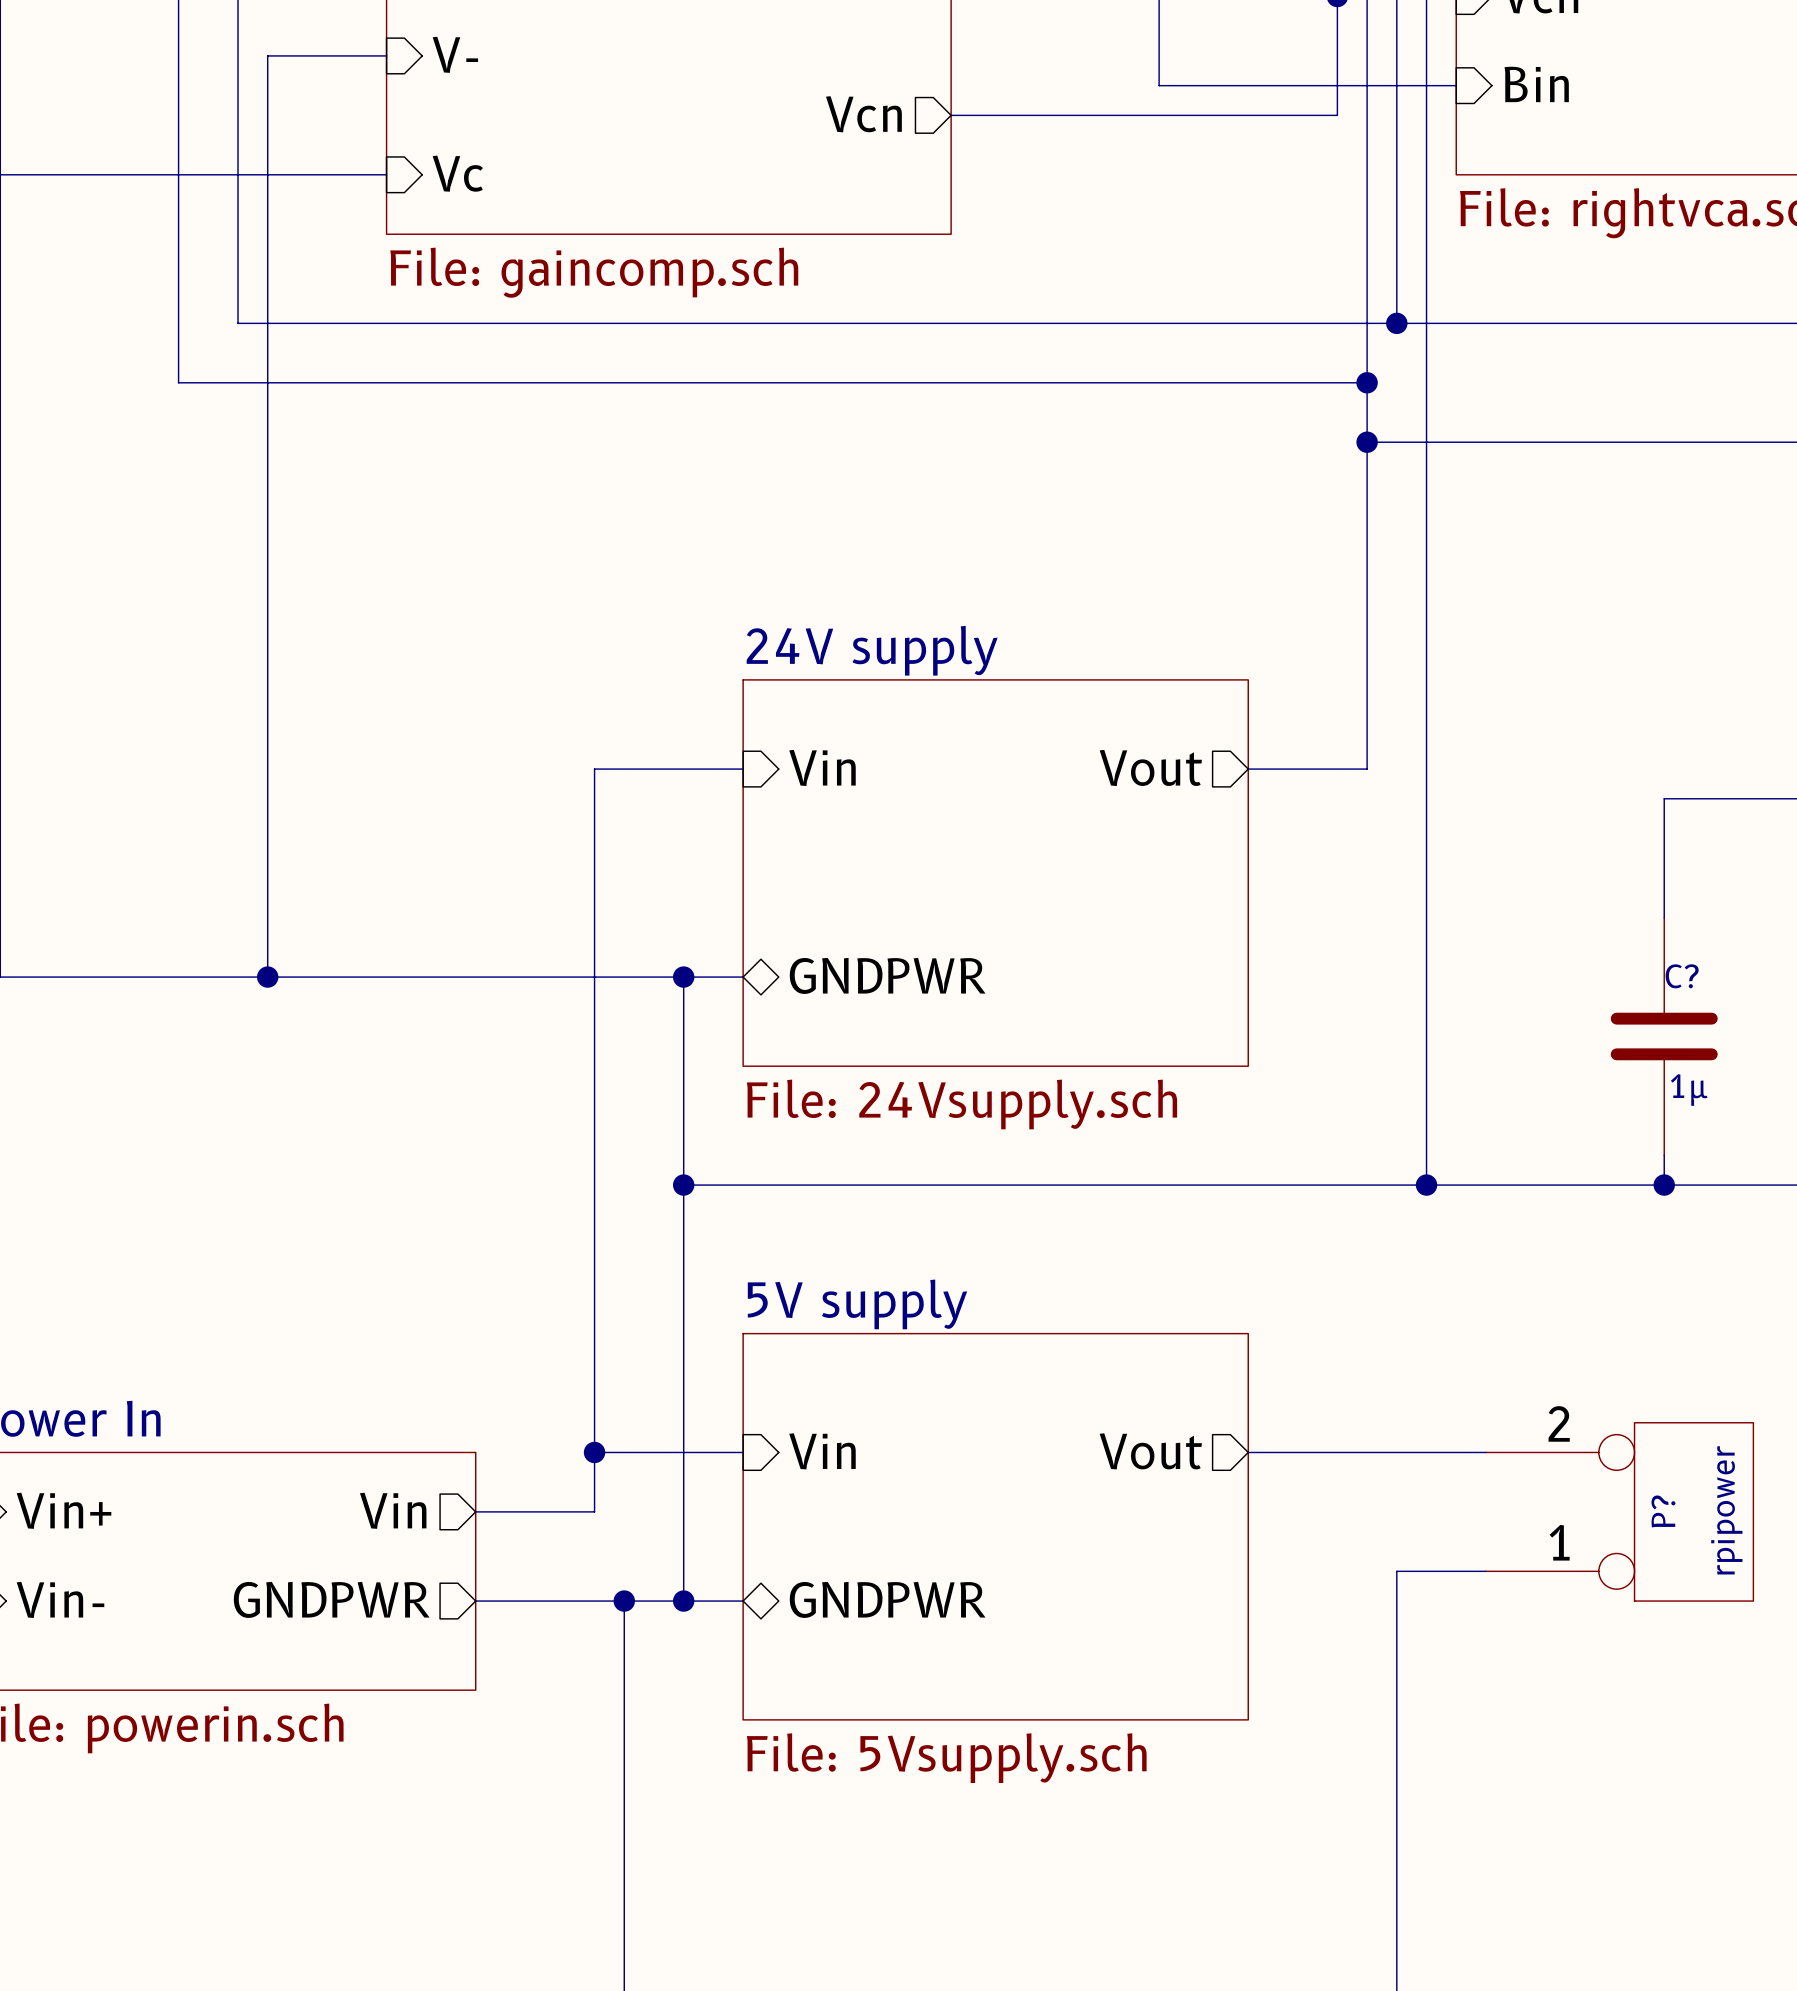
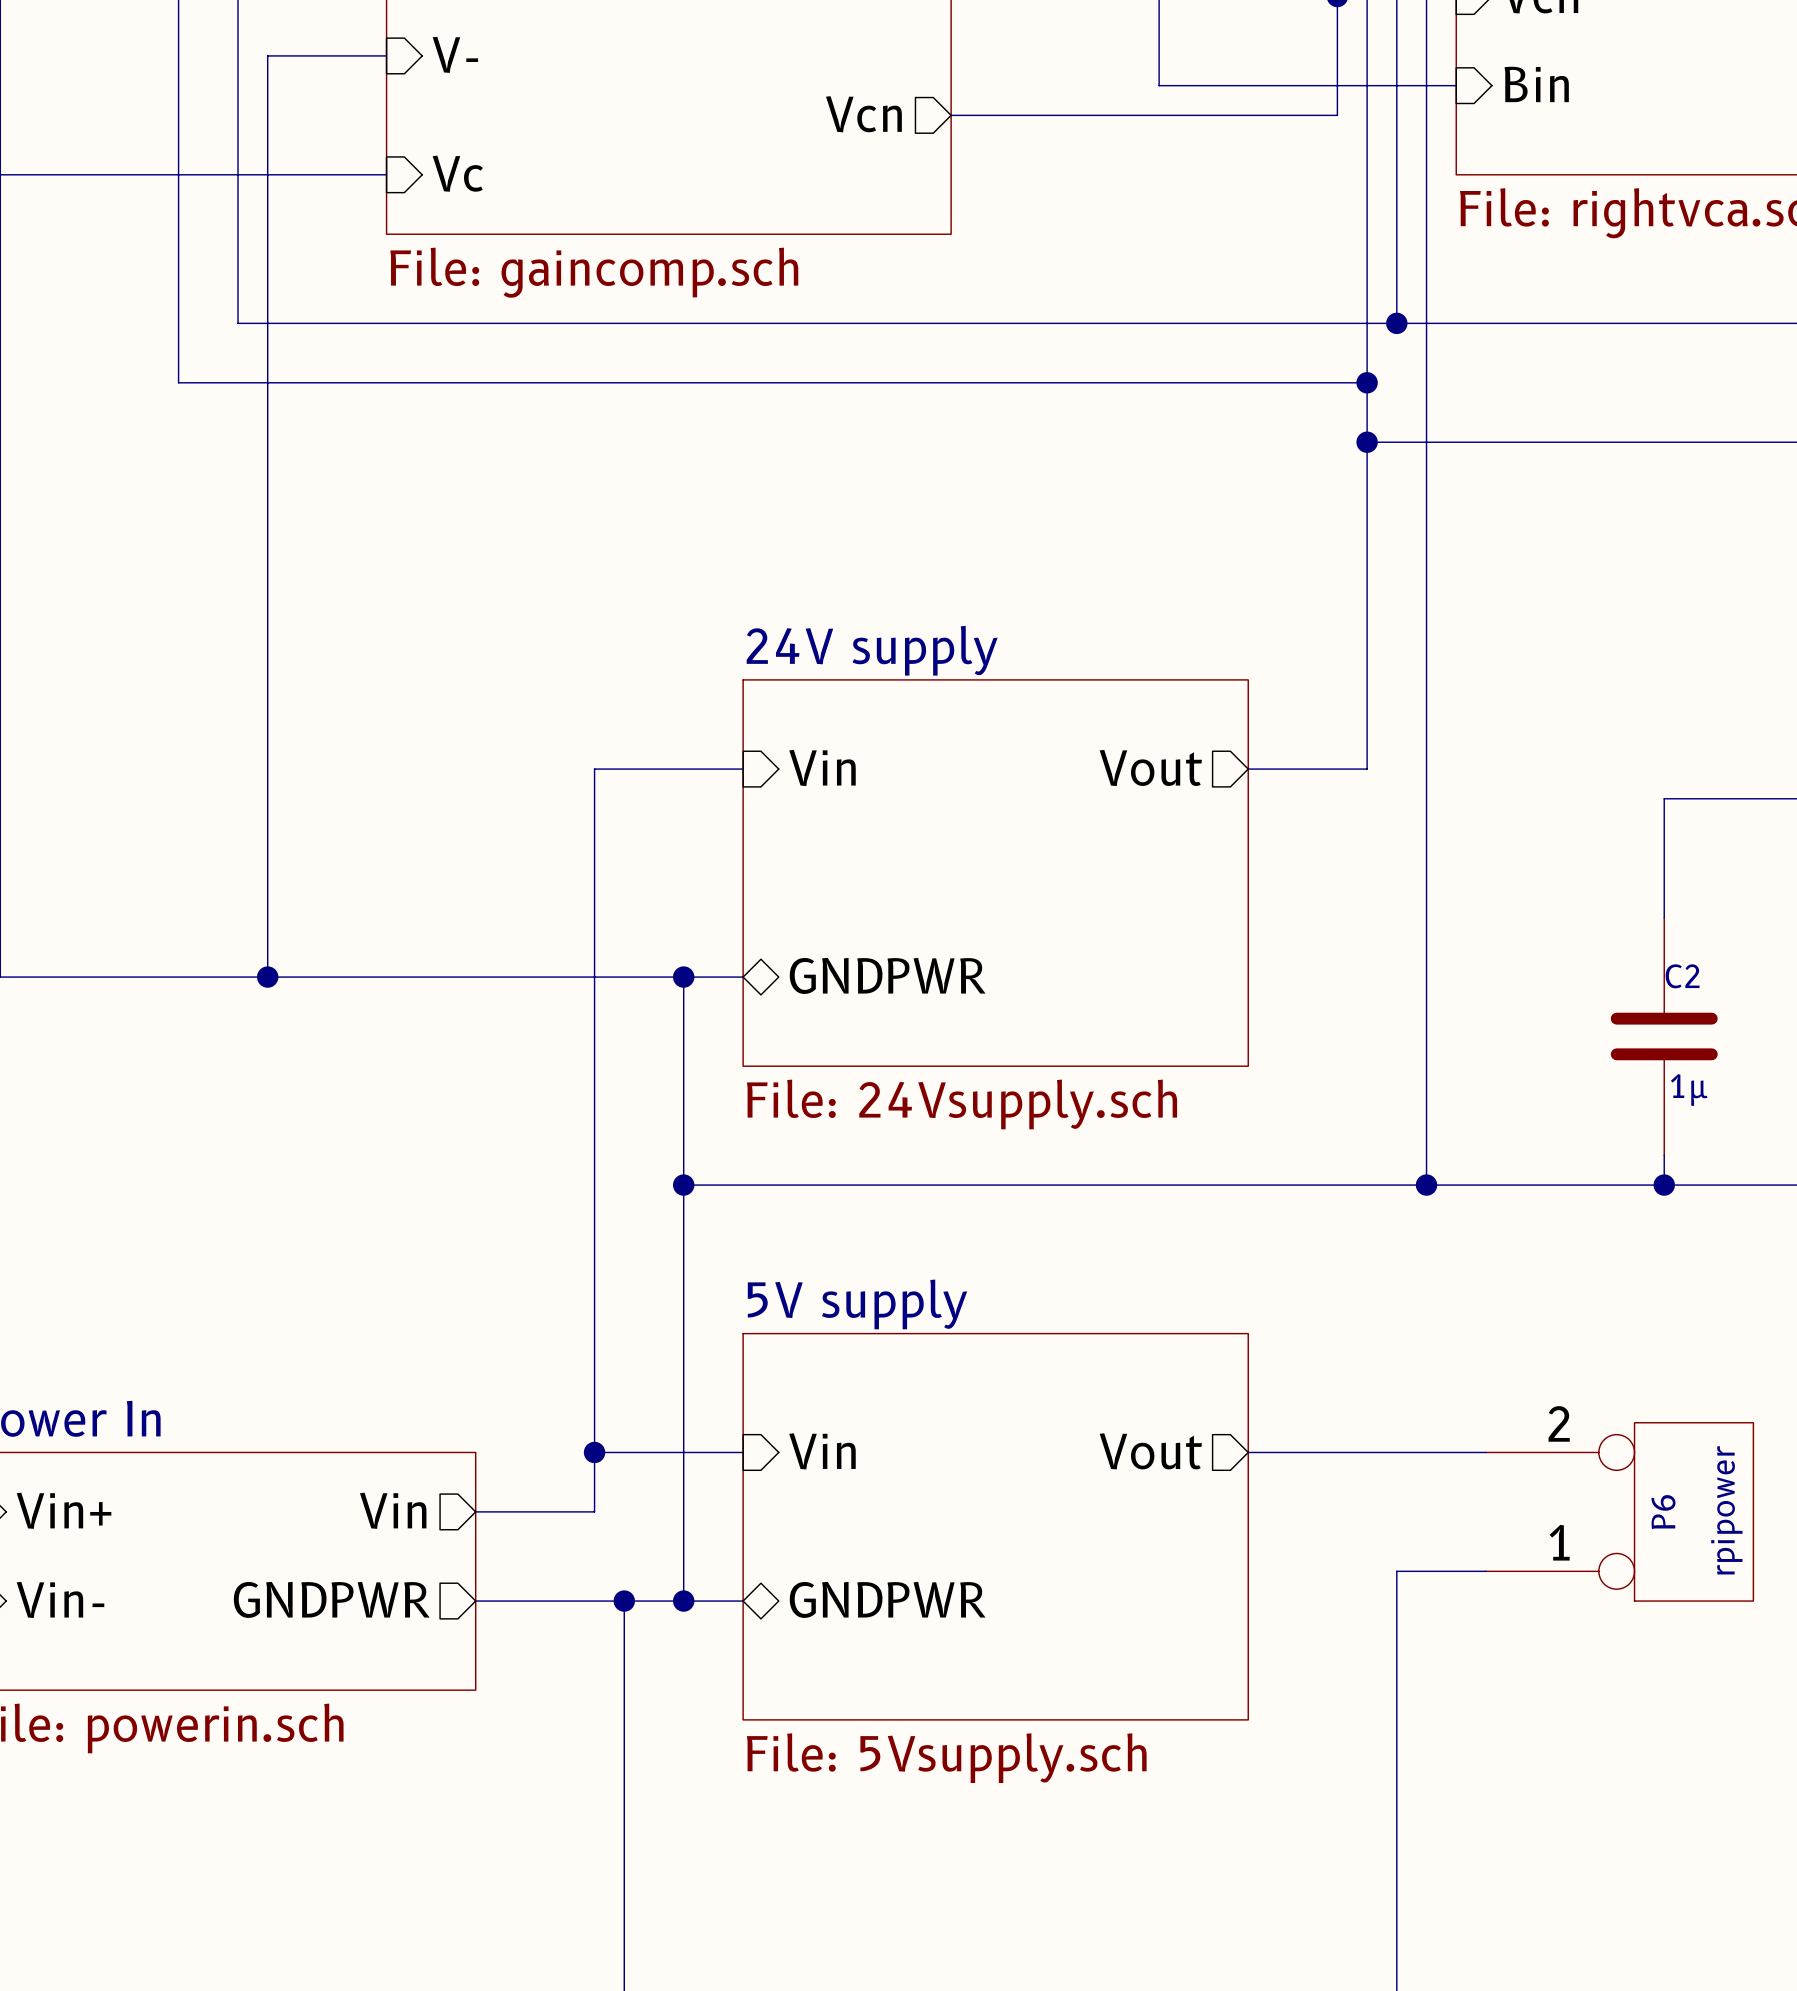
C? name: C? (1682, 976) -> C2 (1682, 976)
P? name: P? (1663, 1511) -> P6 (1663, 1512)

